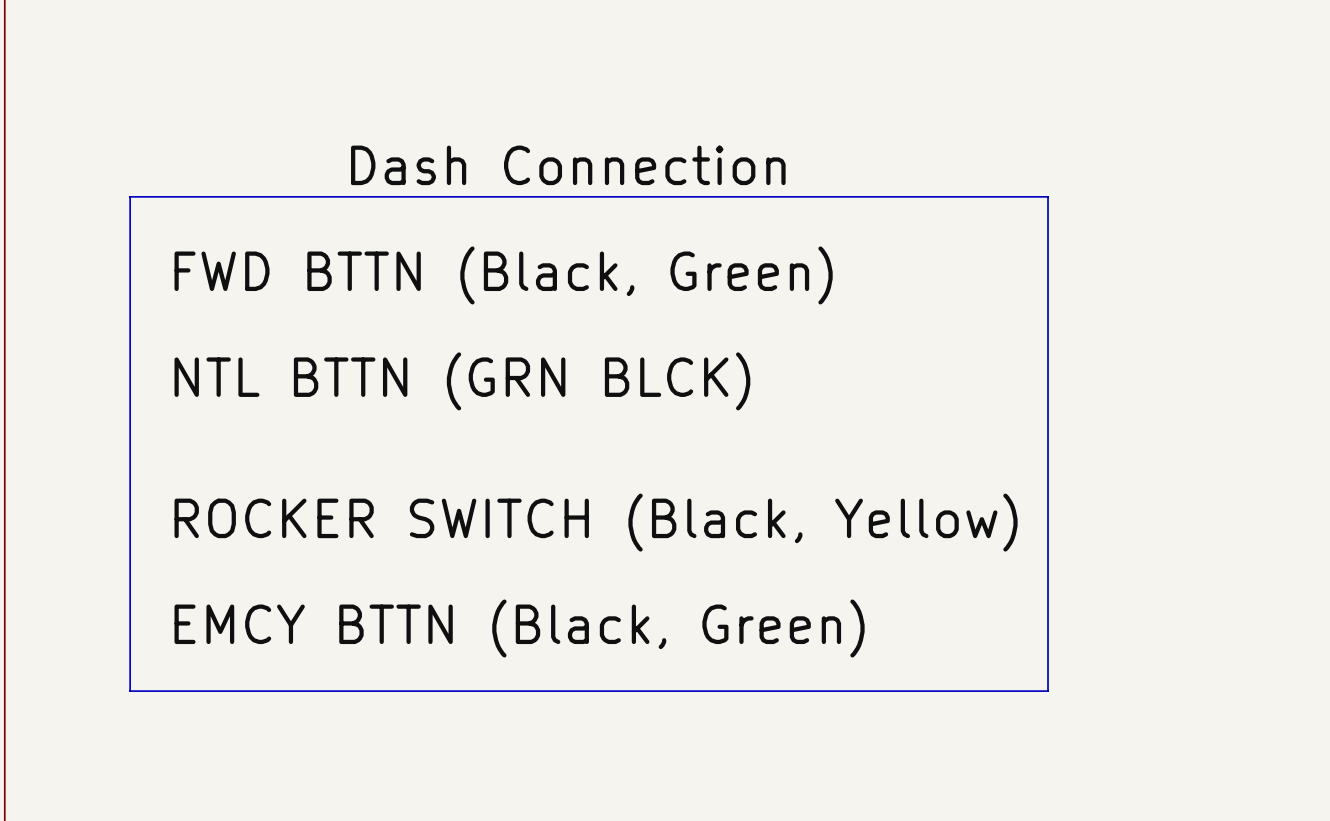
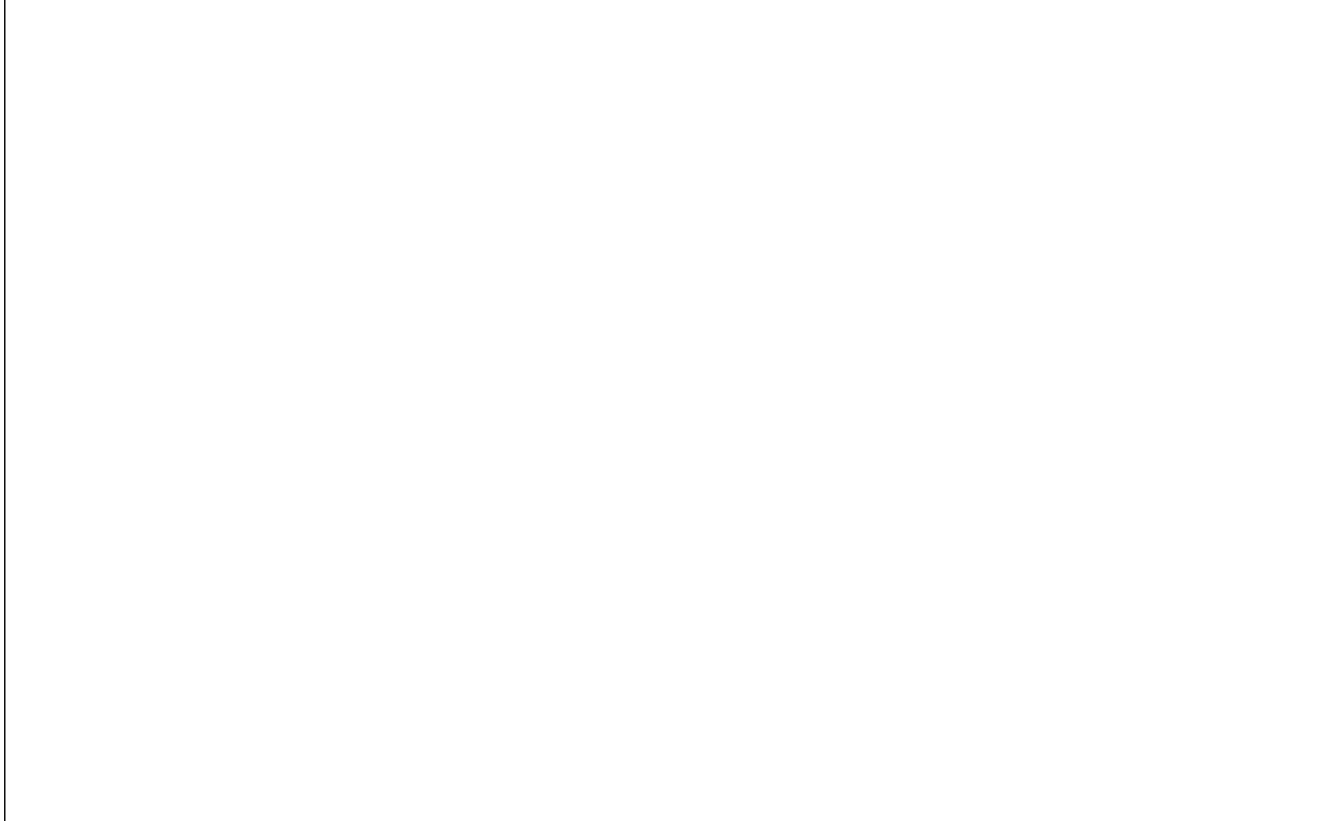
label: Dash Connection (568, 165) -> none
bus: (130, 196) (130, 691) (1048, 691) (1048, 196) (130, 196) -> none
label: FWD BTTN (Black, Green) (503, 275) -> none
label: NTL BTTN (GRN BLCK) (462, 381) -> none
label: ROCKER SWITCH (Black, Yellow) (596, 522) -> none
label: EMCY BTTN (Black, Green) (519, 628) -> none

